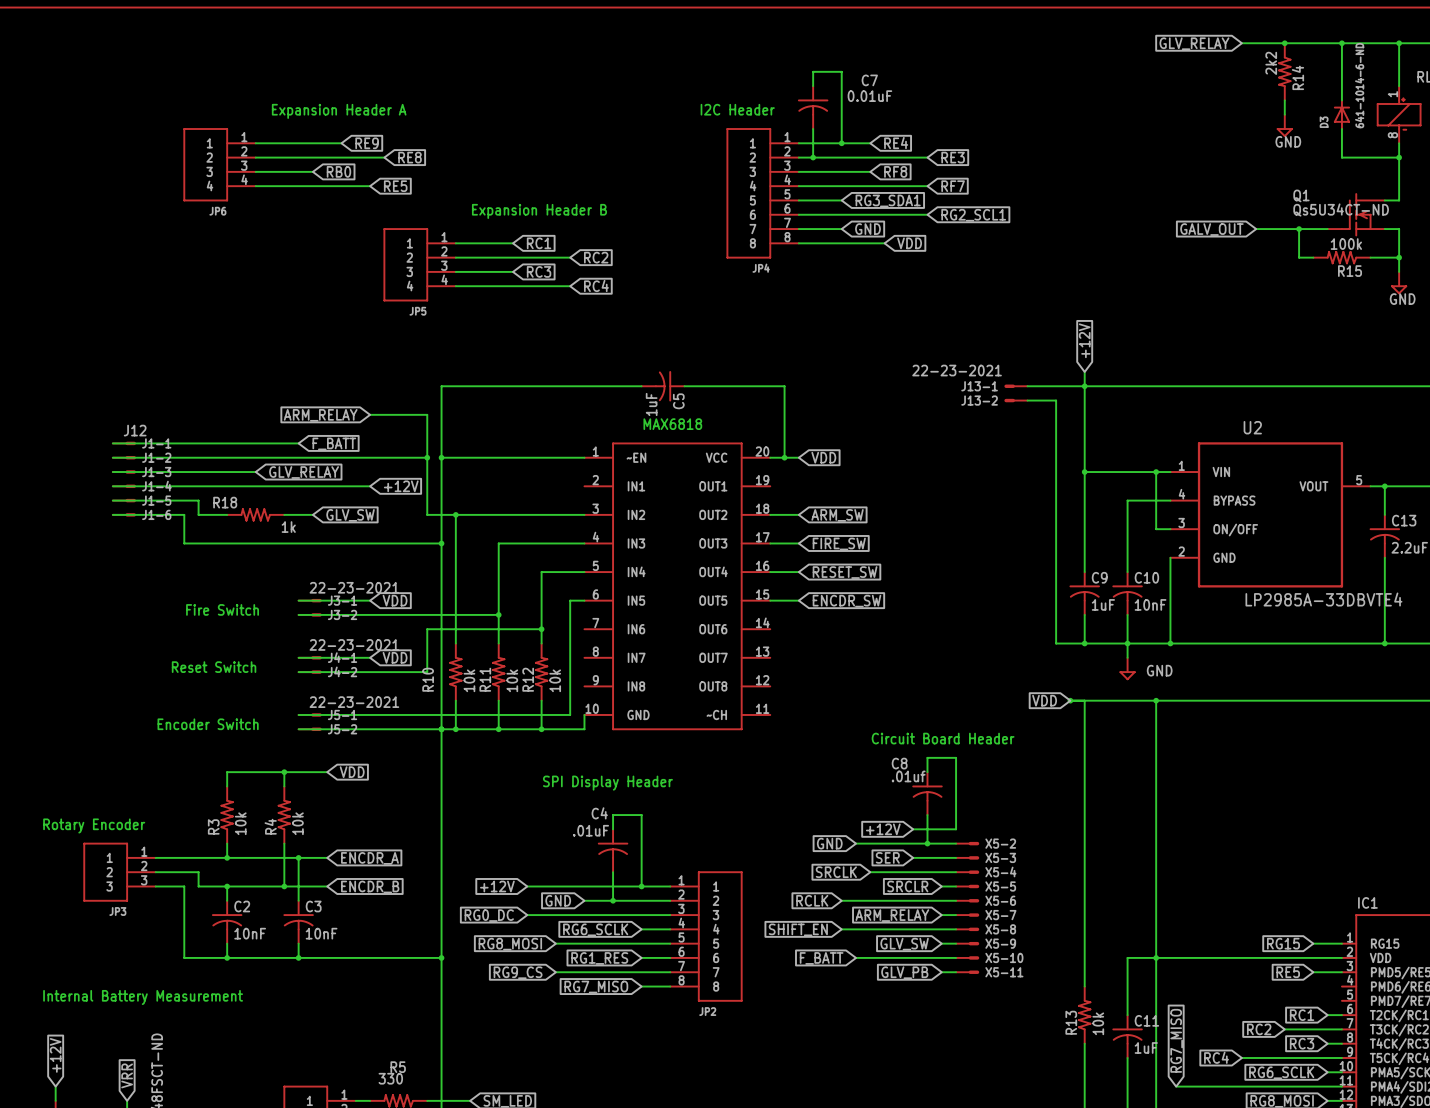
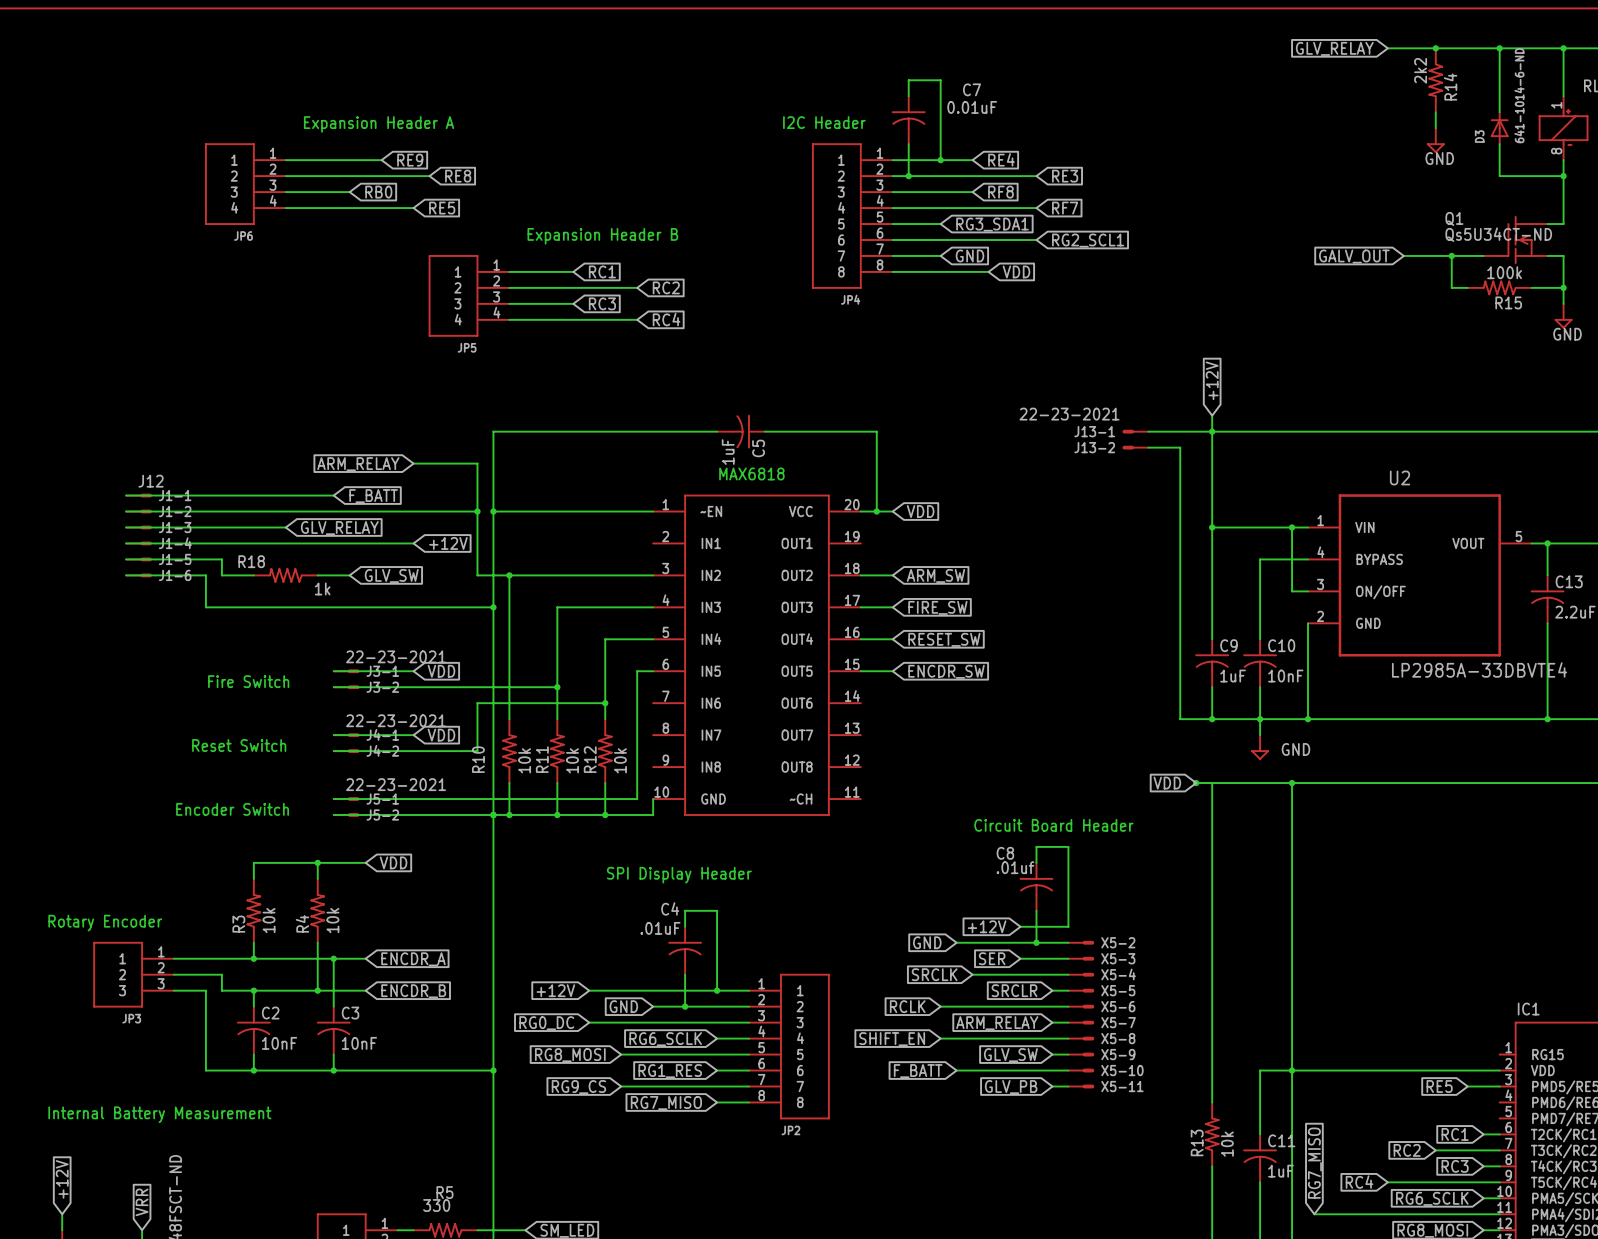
global label: RG15 (1283, 943) -> none
wire: (1313, 943) (1341, 943) -> none

